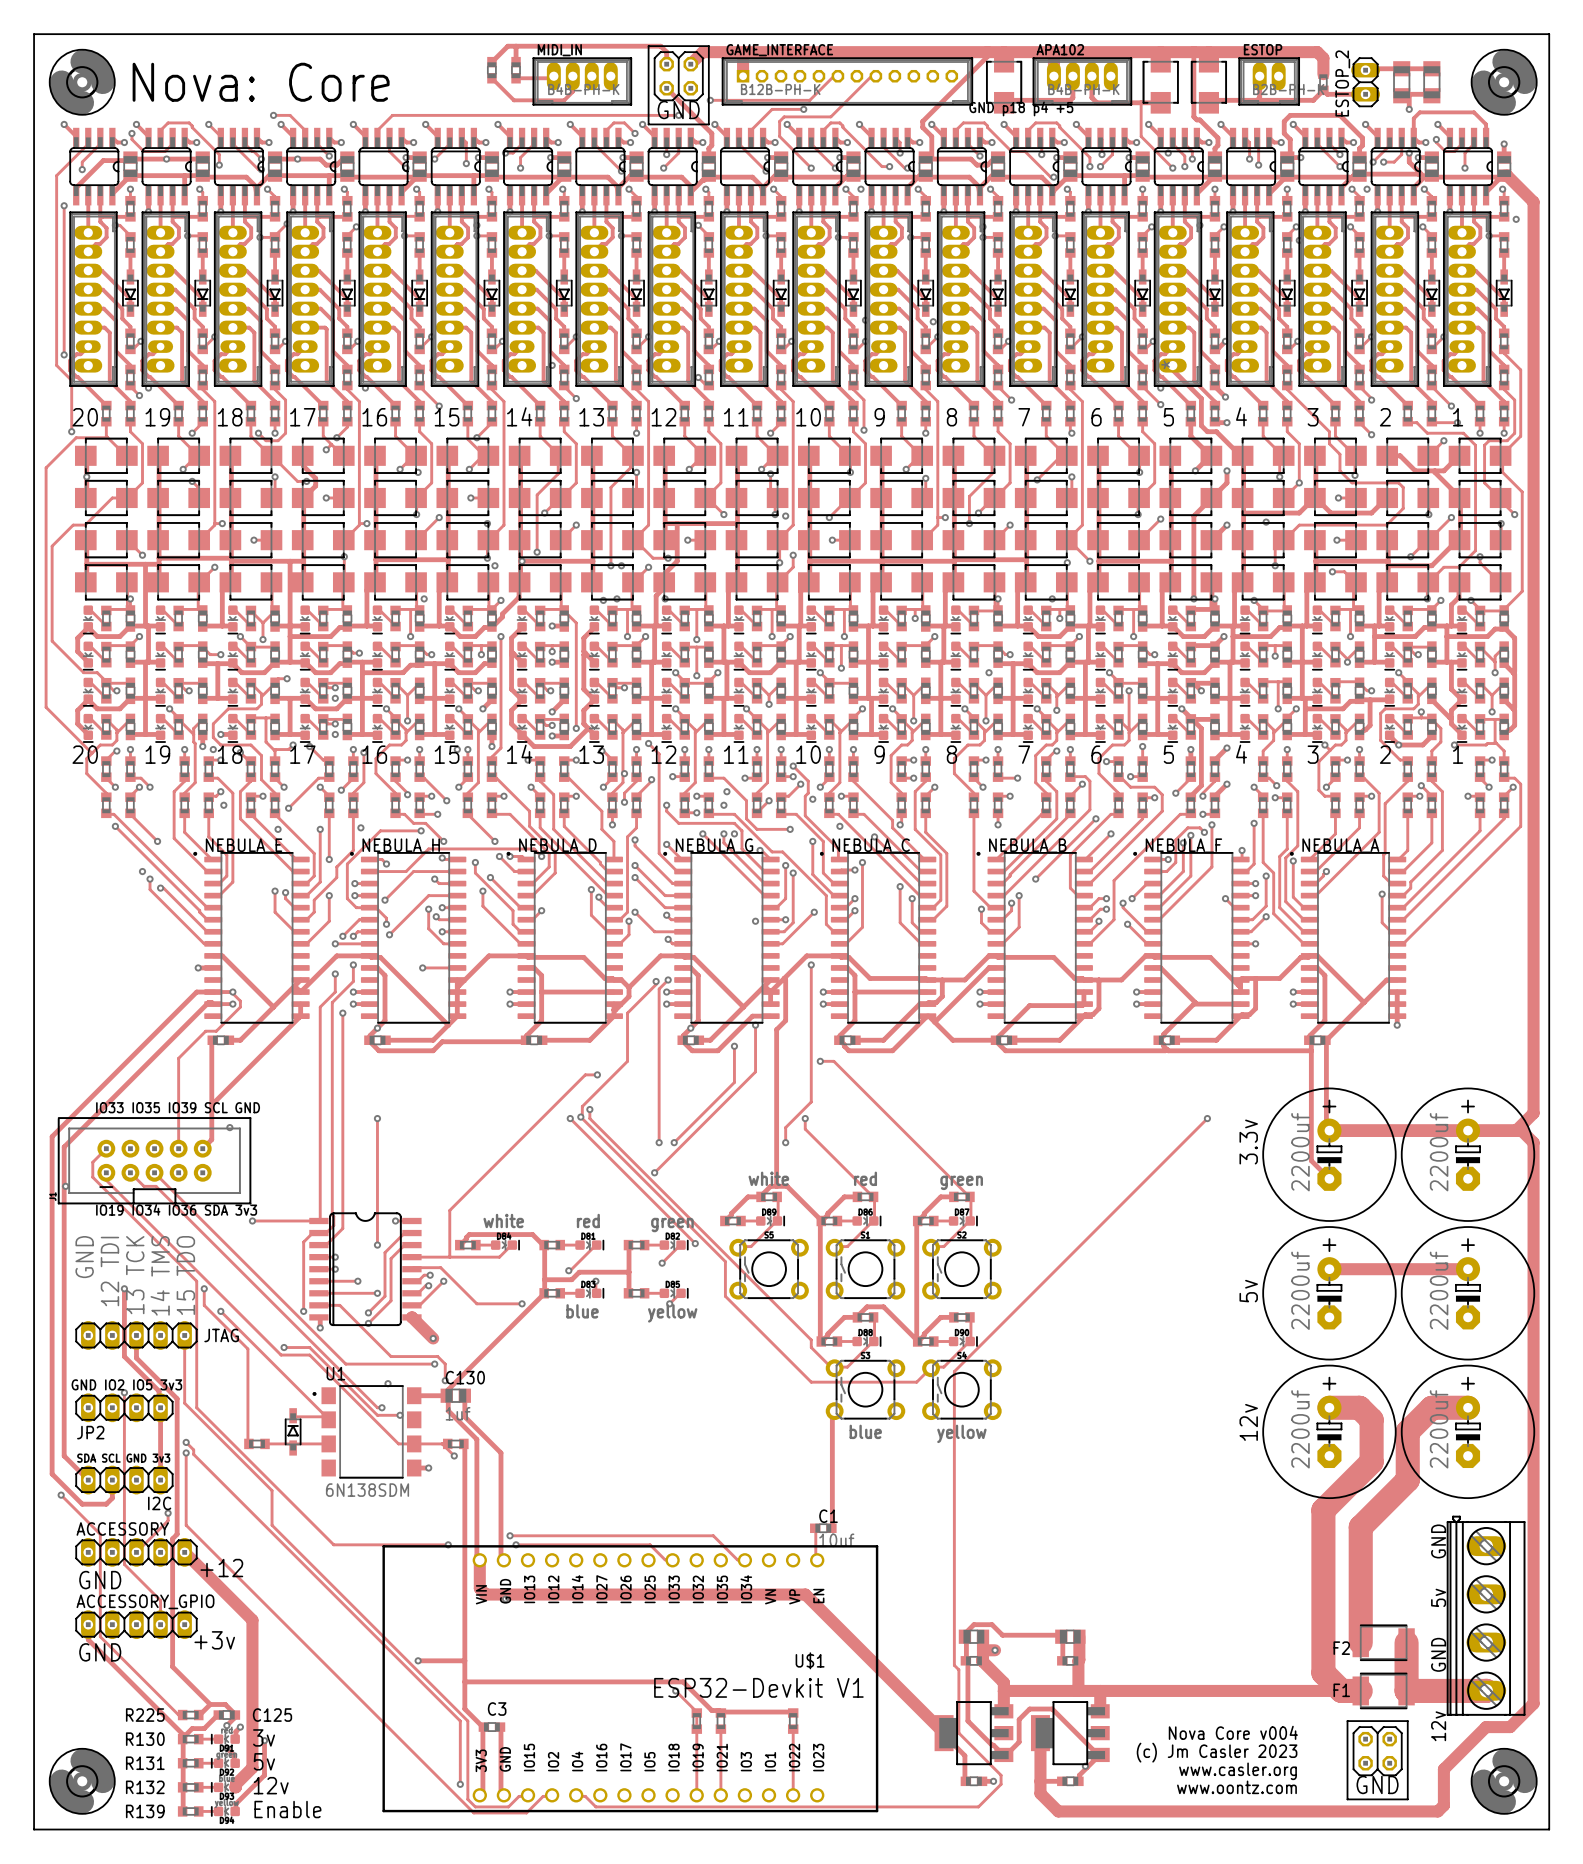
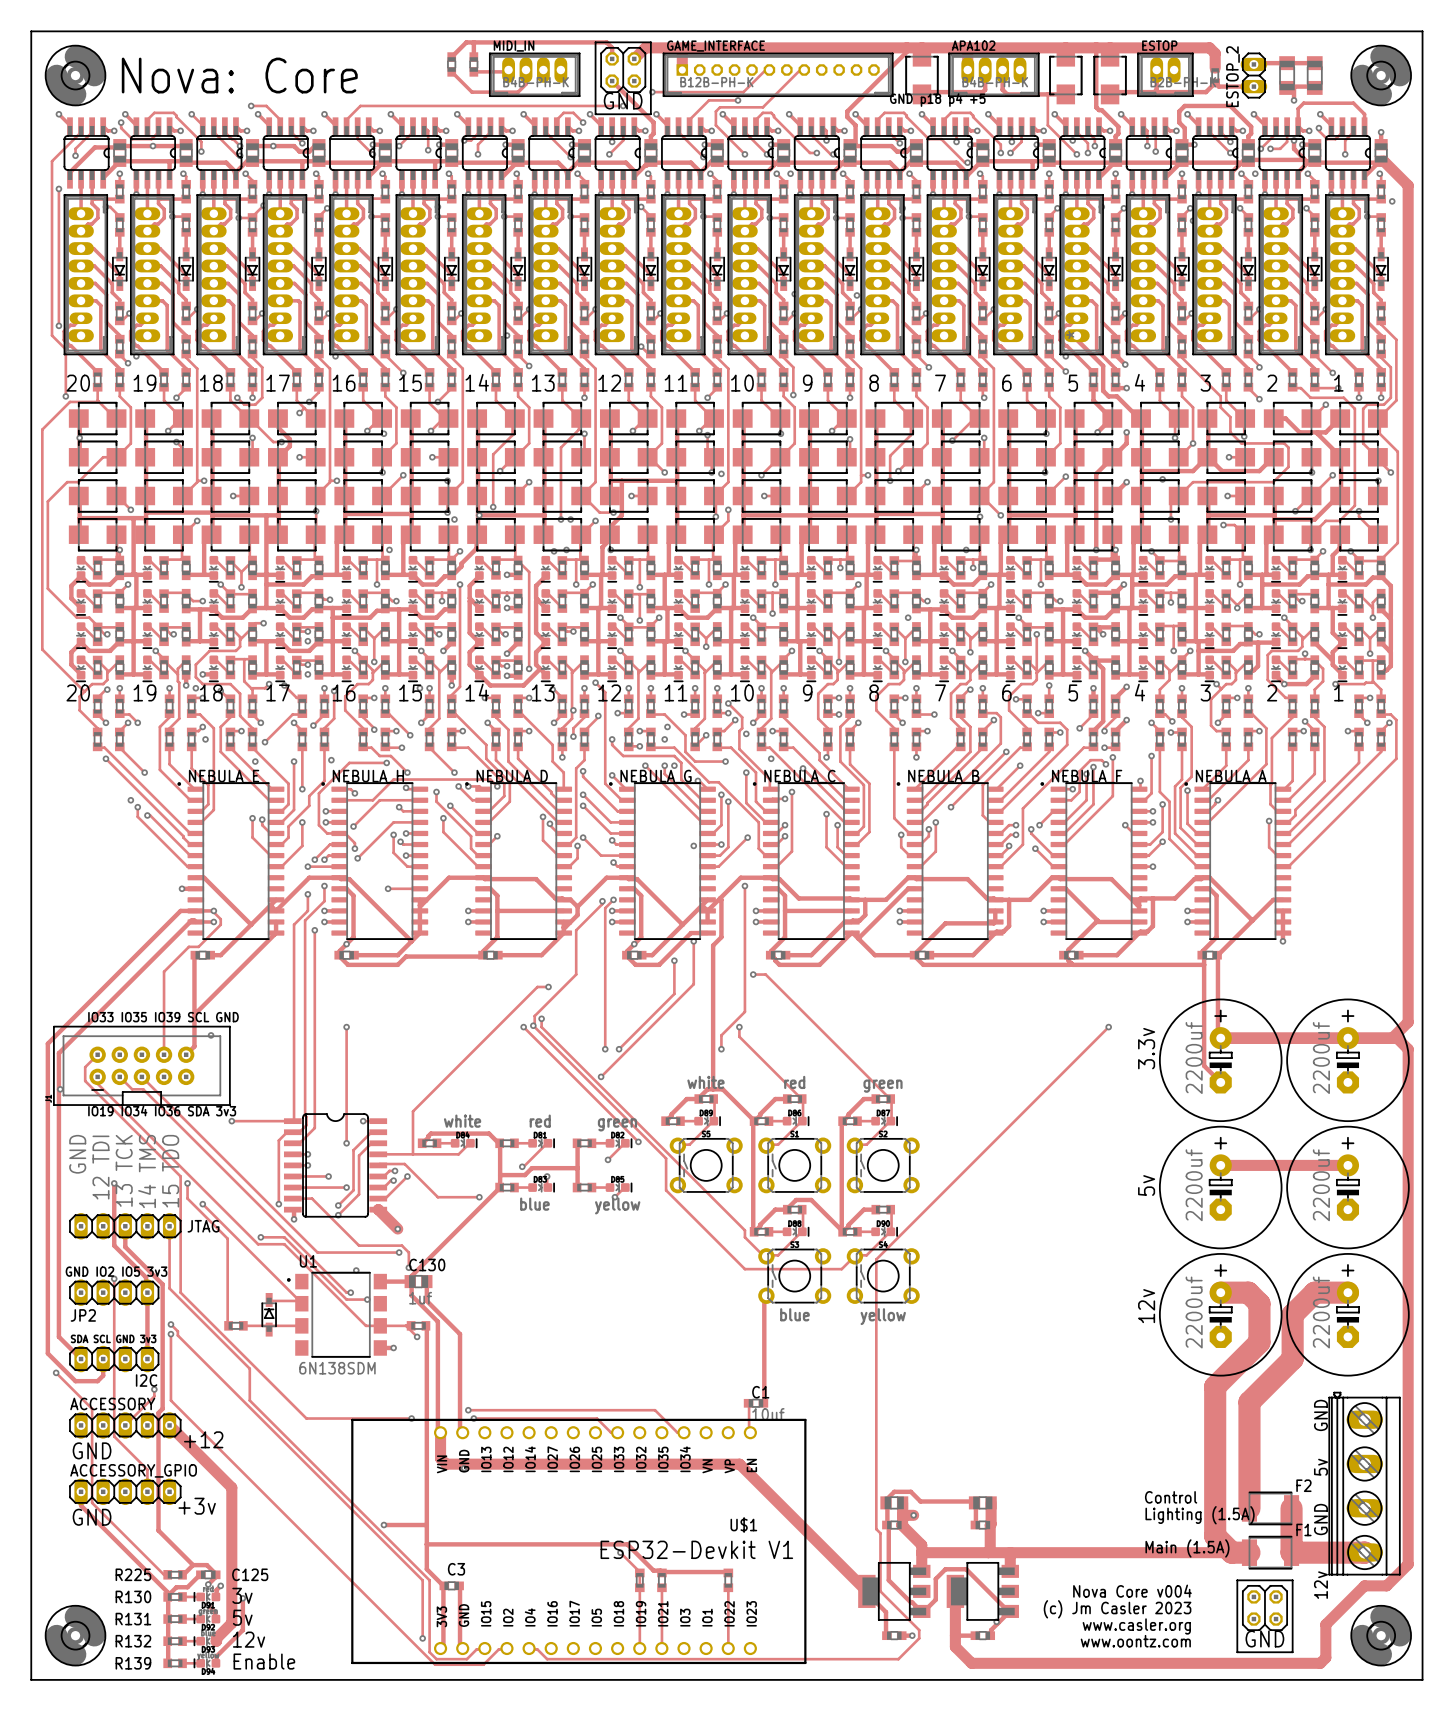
text: none -> Control (1171, 1497)
F2 name position: F2 (1341, 1648) -> F2 (1303, 1485)
text: none -> Lighting (1.5A) (1200, 1515)
text: none -> Main (1.5A) (1187, 1548)
F1 name position: F1 (1341, 1690) -> F1 (1303, 1529)

